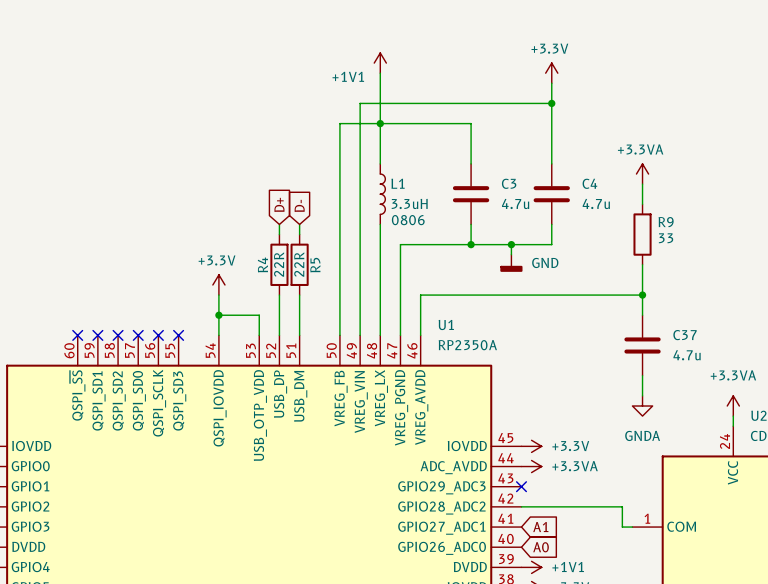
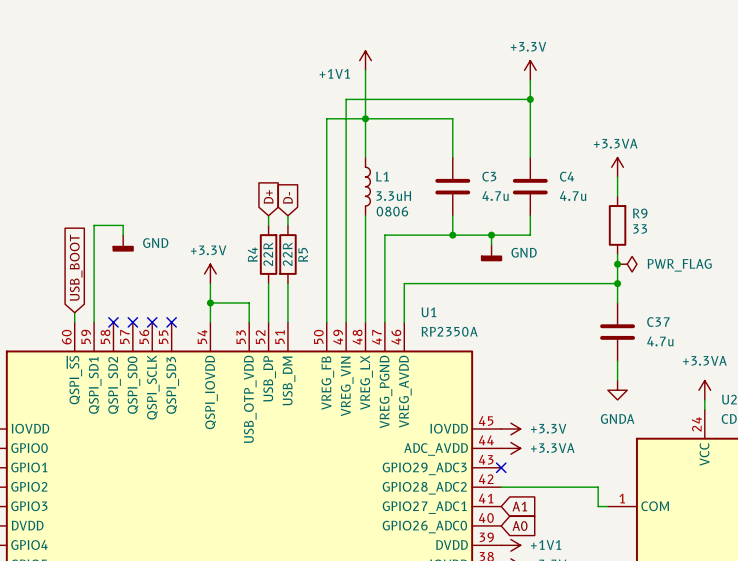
wire: none -> (123, 235) (123, 225) (94, 225) (94, 322)
power symbol: none -> GND (123, 243)
junction: none -> (617, 264)
power symbol: none -> PWR_FLAG (627, 264)
global label: none -> USB_BOOT (76, 267)
wire: none -> (74, 312) (74, 322)
no-connect mark: (77, 335) -> none
no-connect mark: (97, 335) -> none

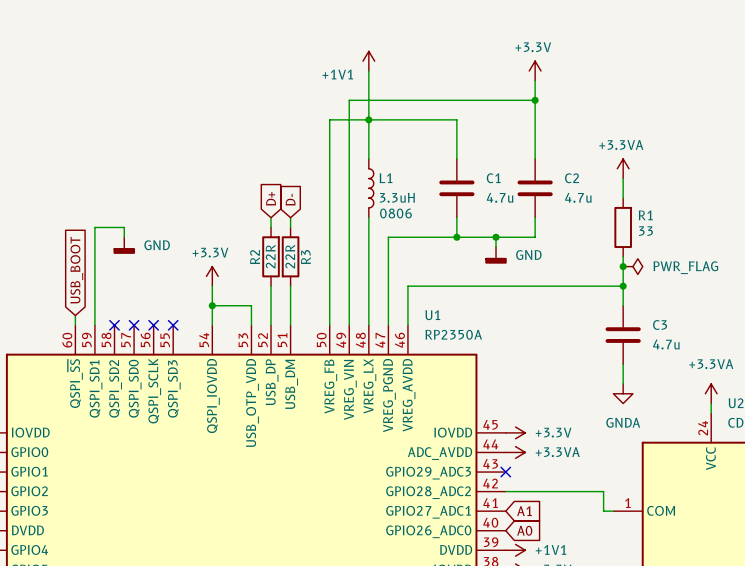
C3 name: C3 (489, 176) -> C1 (493, 178)
C4 name: C4 (567, 176) -> C2 (572, 178)
R9 name: R9 (640, 213) -> R1 (645, 215)
R4 name: R4 (252, 254) -> R2 (255, 257)
R5 name: R5 (303, 254) -> R3 (305, 257)
C37 name: C37 (658, 322) -> C3 (660, 325)

